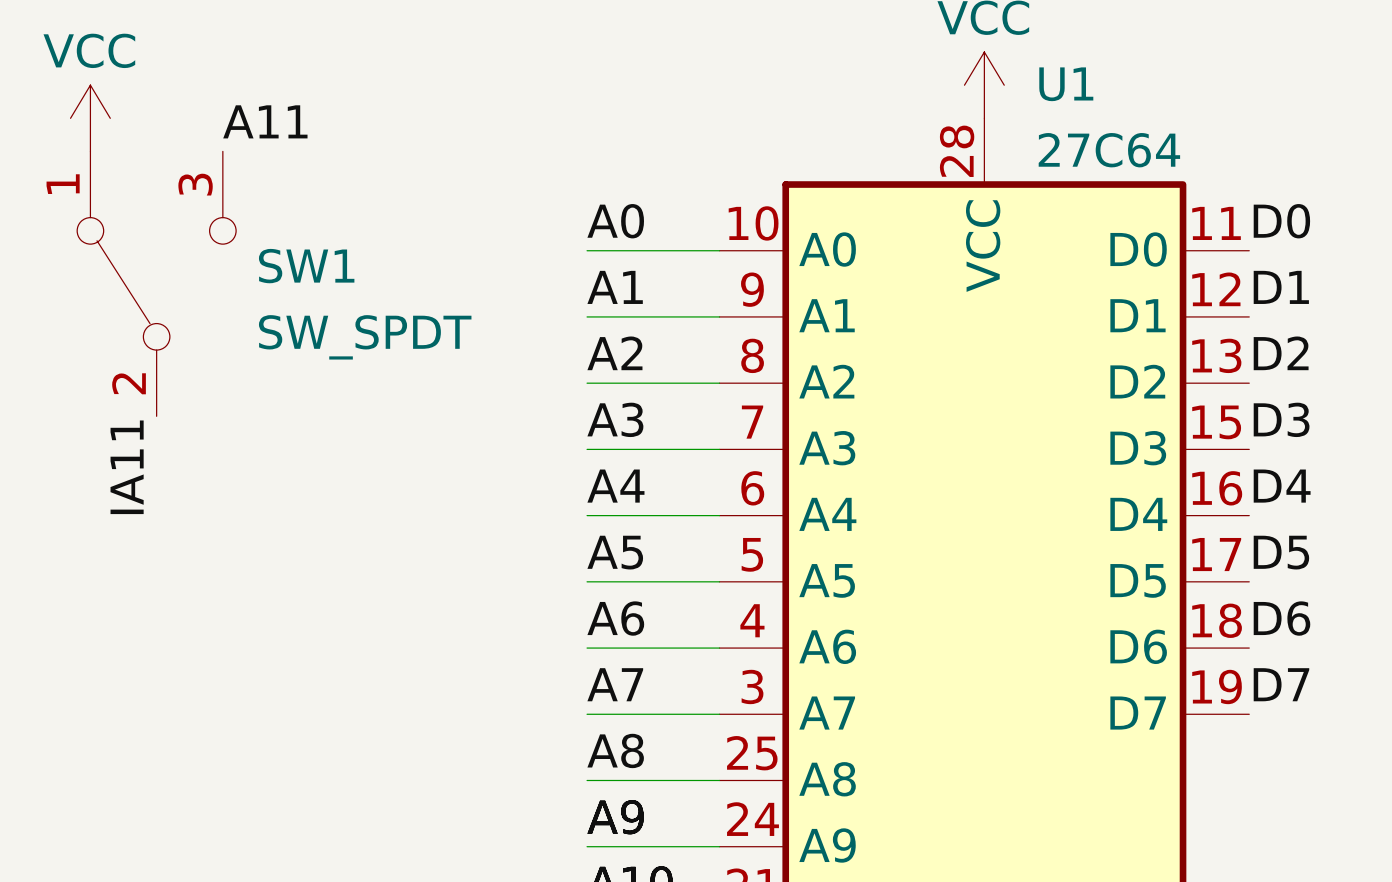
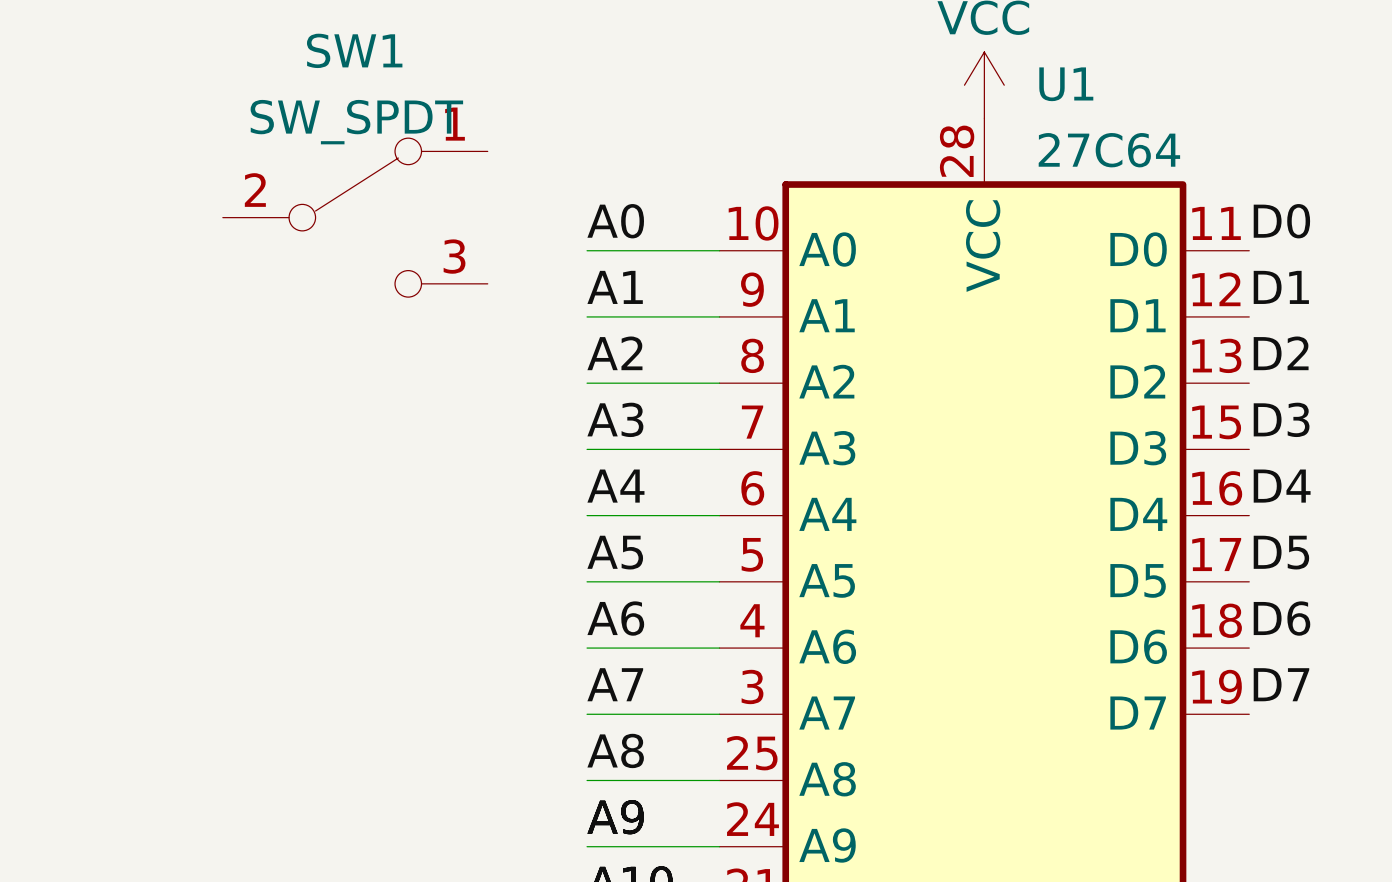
power symbol: VCC (90, 118) -> none
label: A11 (265, 121) -> none
SW1 name position: SW1 (306, 266) -> SW1 (354, 50)
SW1 rotation: 0° (156, 283) -> 90° clockwise (355, 217)
SW1 position: (156, 283) -> (355, 217)
SW1 value position: SW_SPDT (365, 337) -> SW_SPDT (356, 122)
label: IA11 (127, 467) -> none

